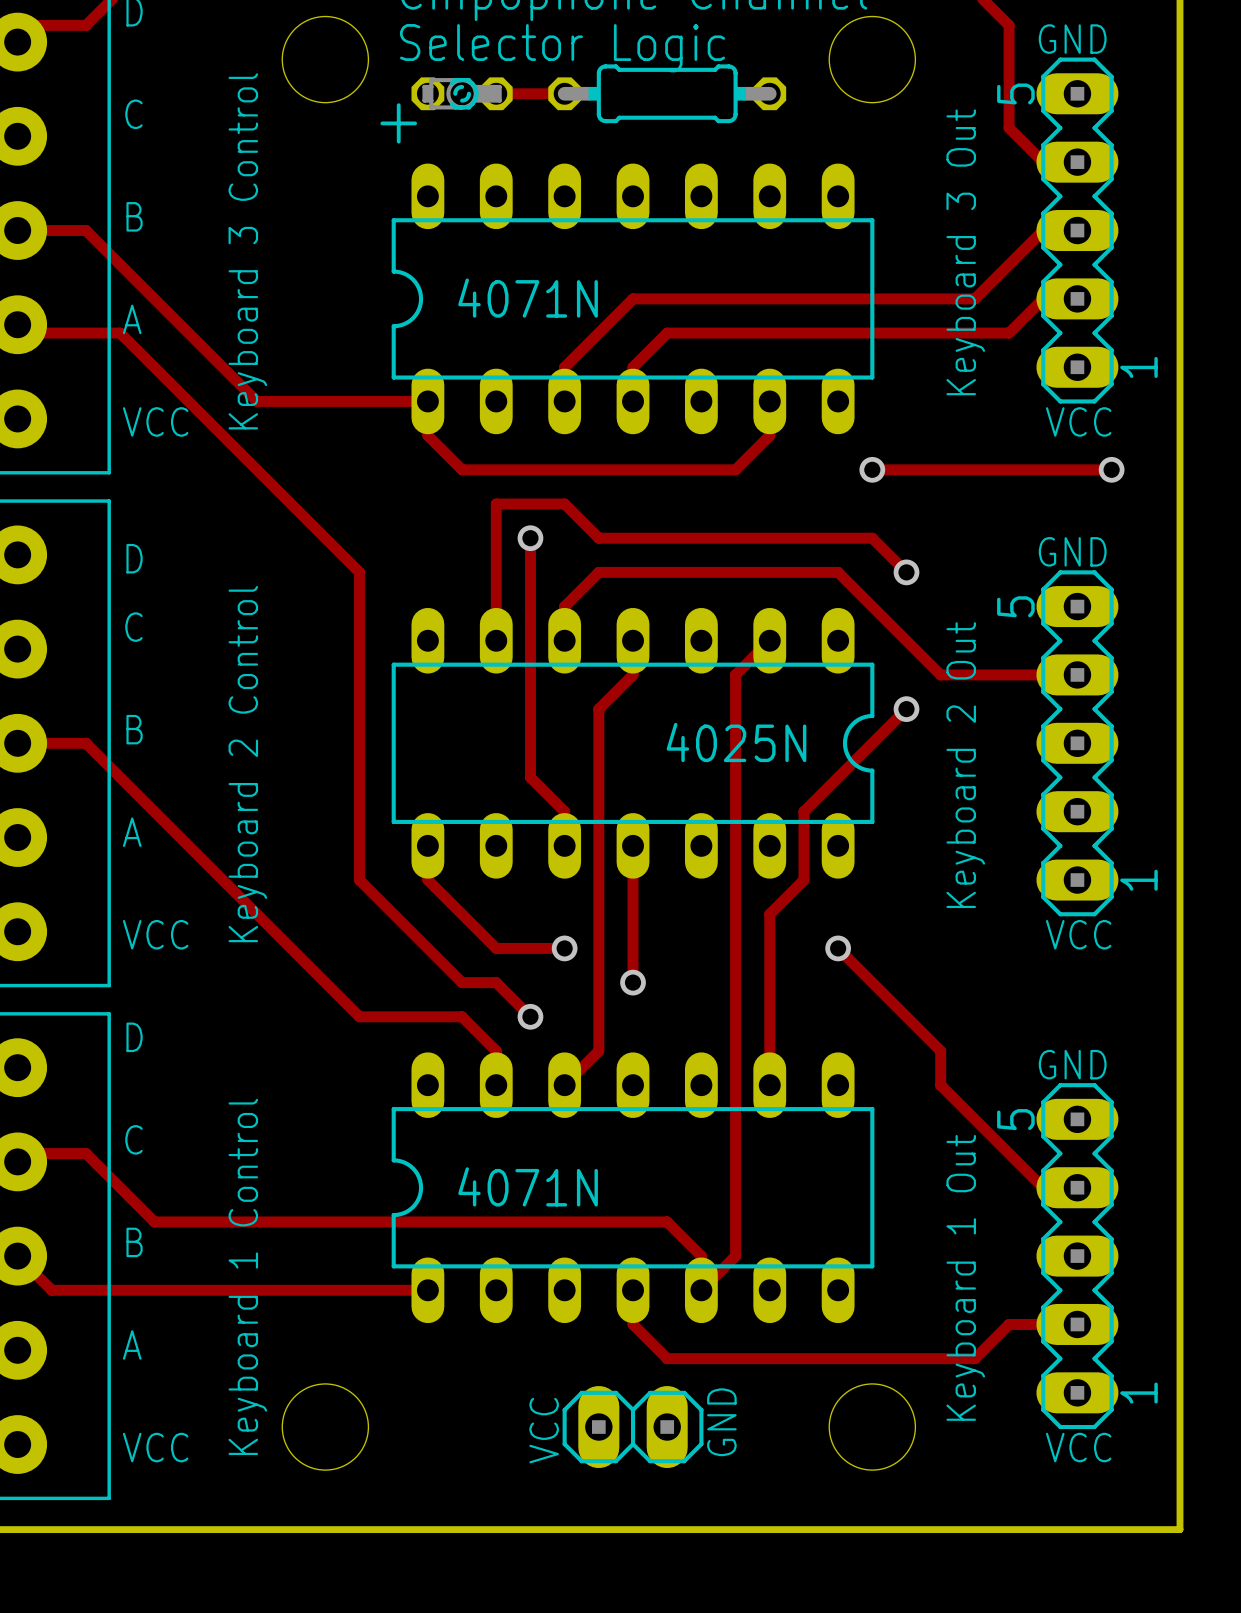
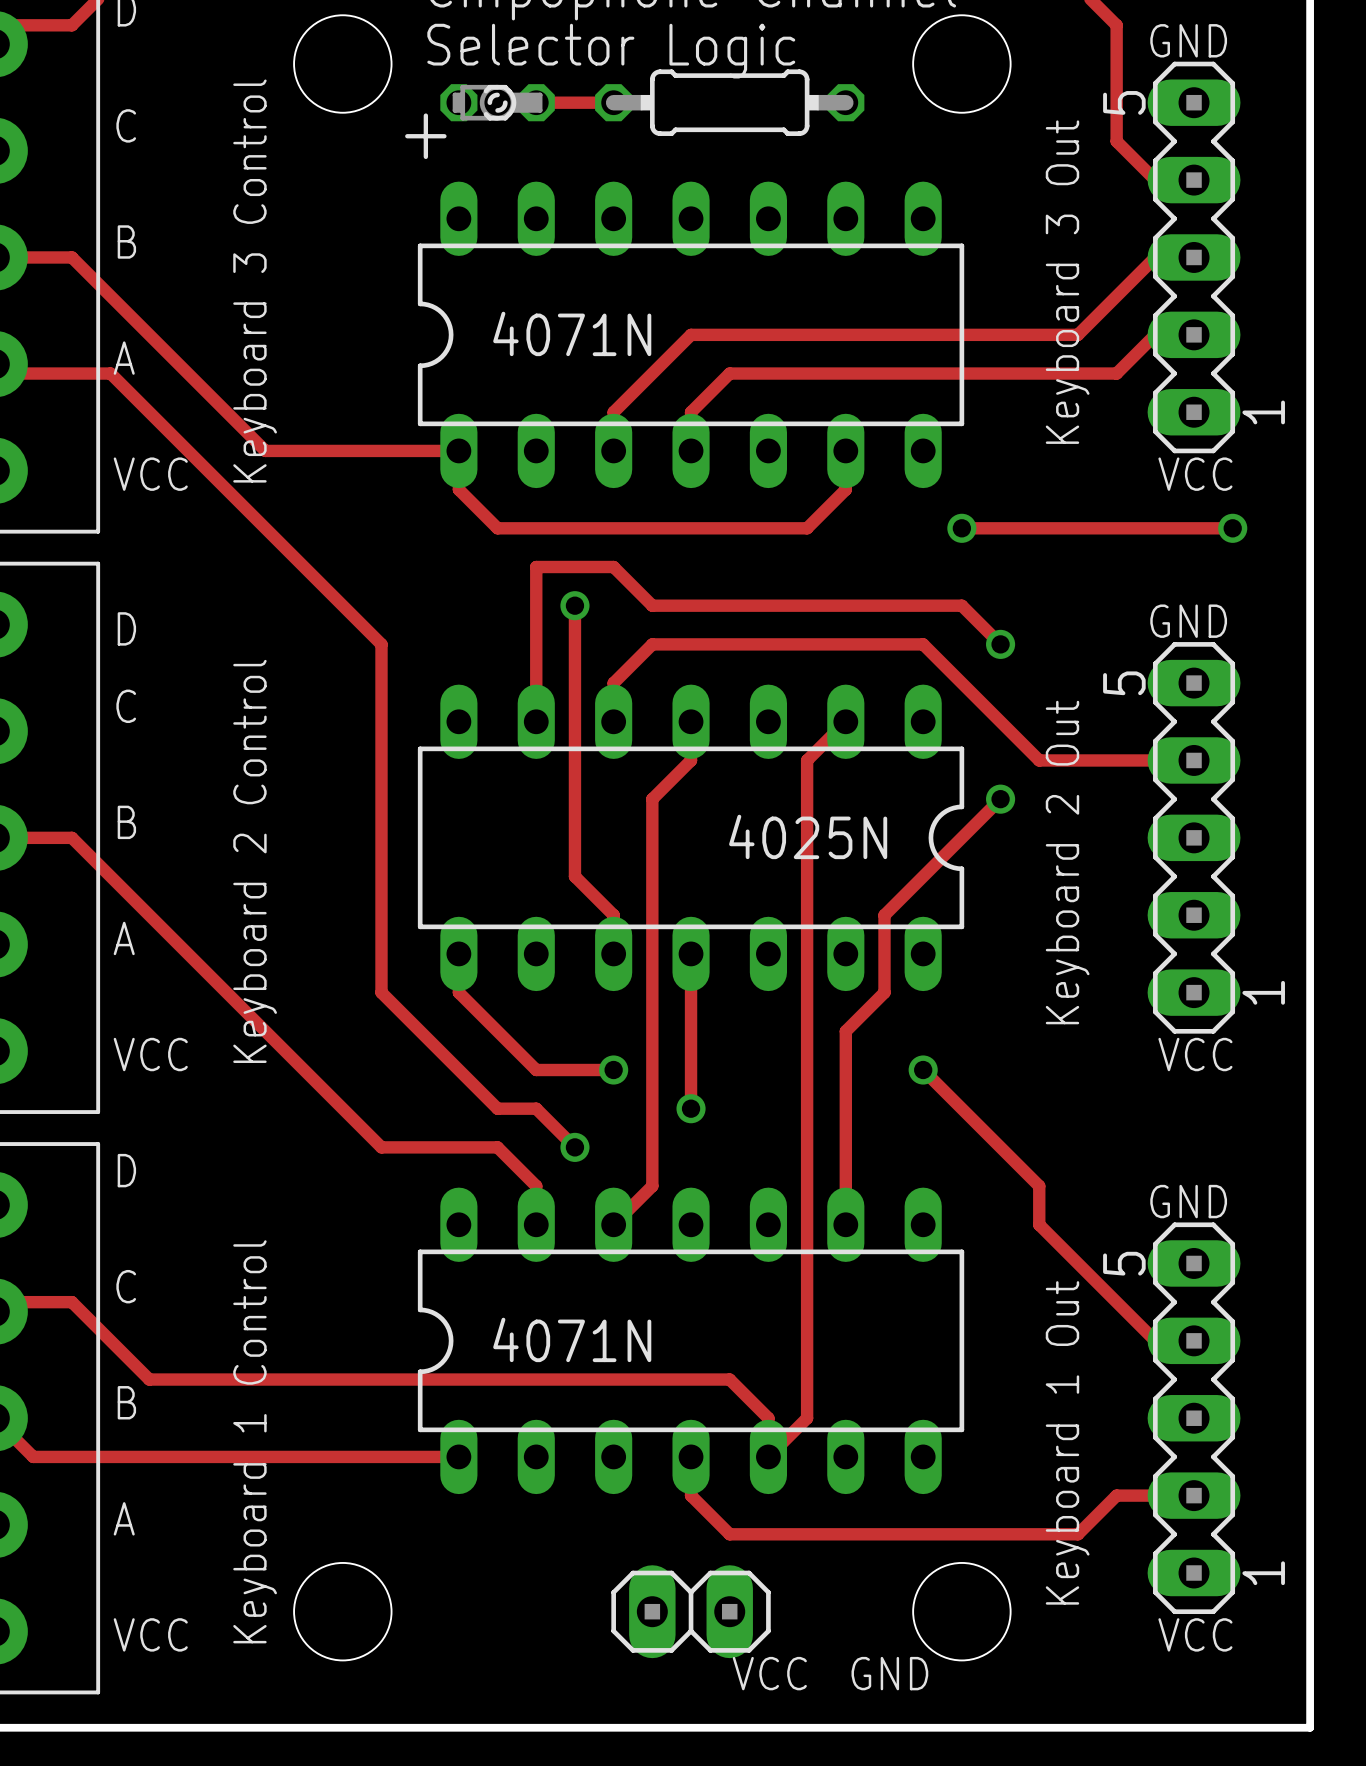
text rotation: 0° (721, 1422) -> 90° clockwise (889, 1673)
text position: GND (721, 1422) -> GND (889, 1673)
text rotation: 0° (544, 1430) -> 90° clockwise (769, 1673)
text position: VCC (544, 1430) -> VCC (769, 1673)

